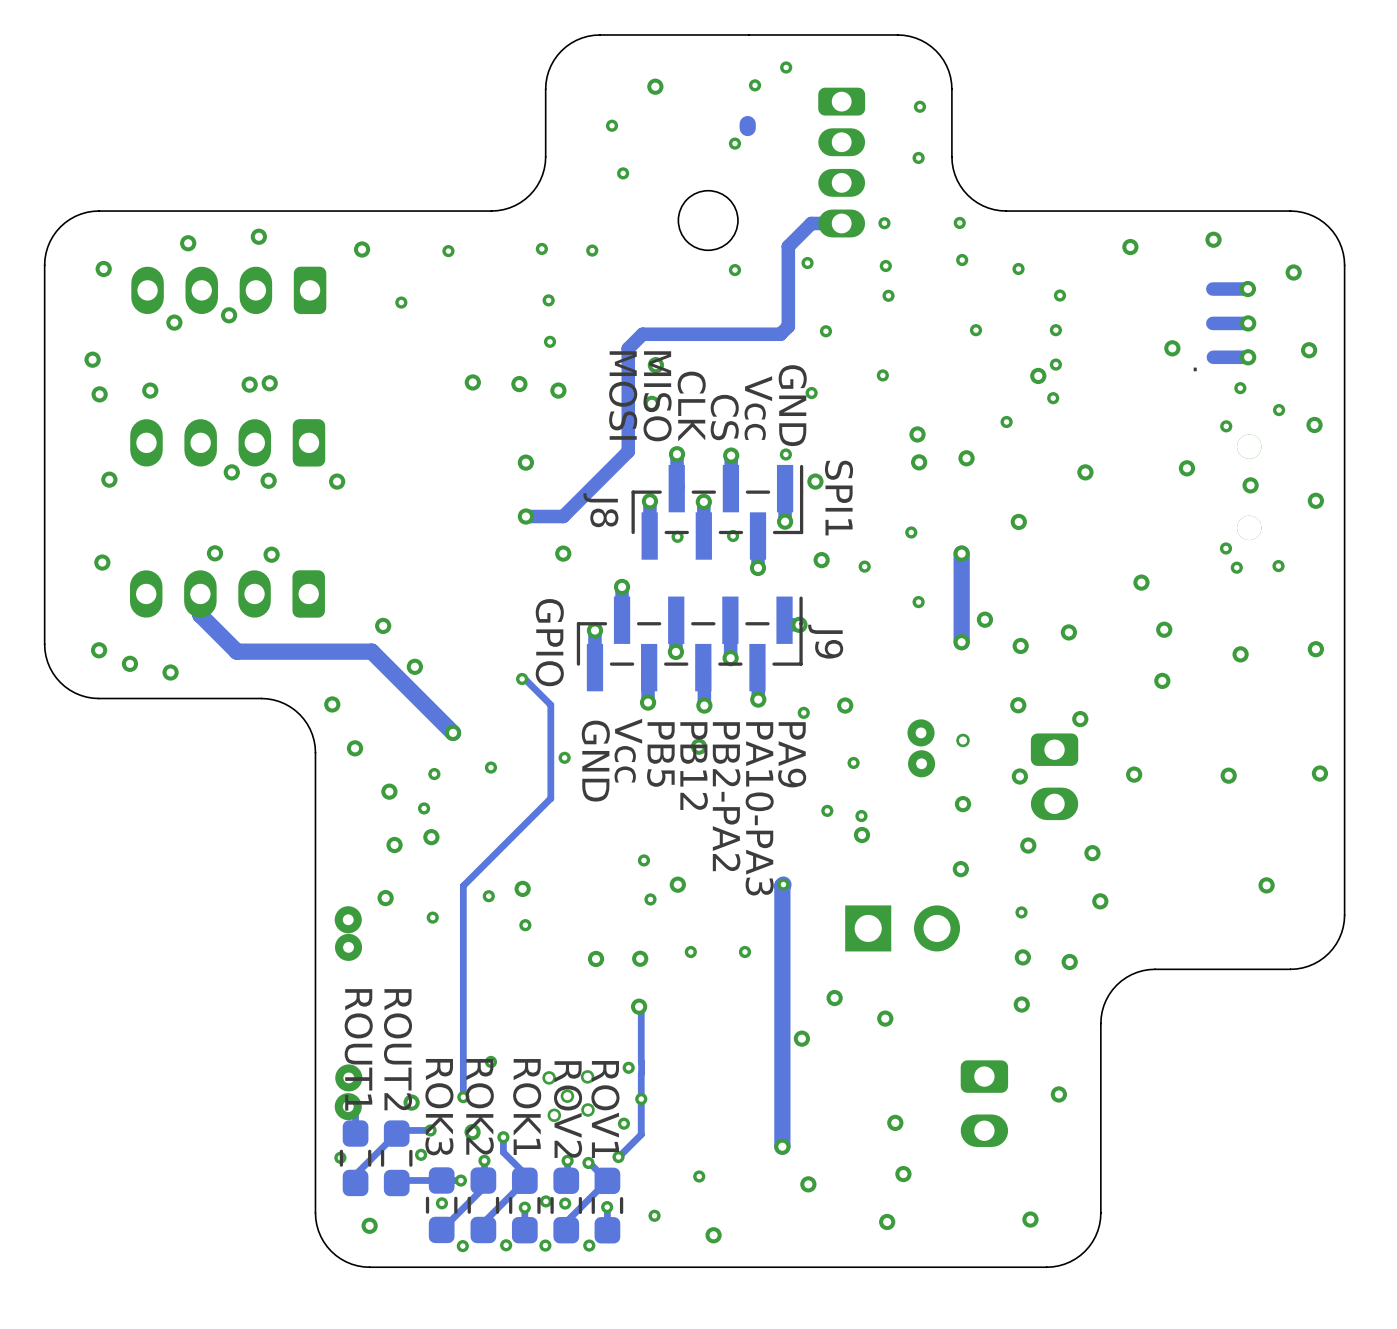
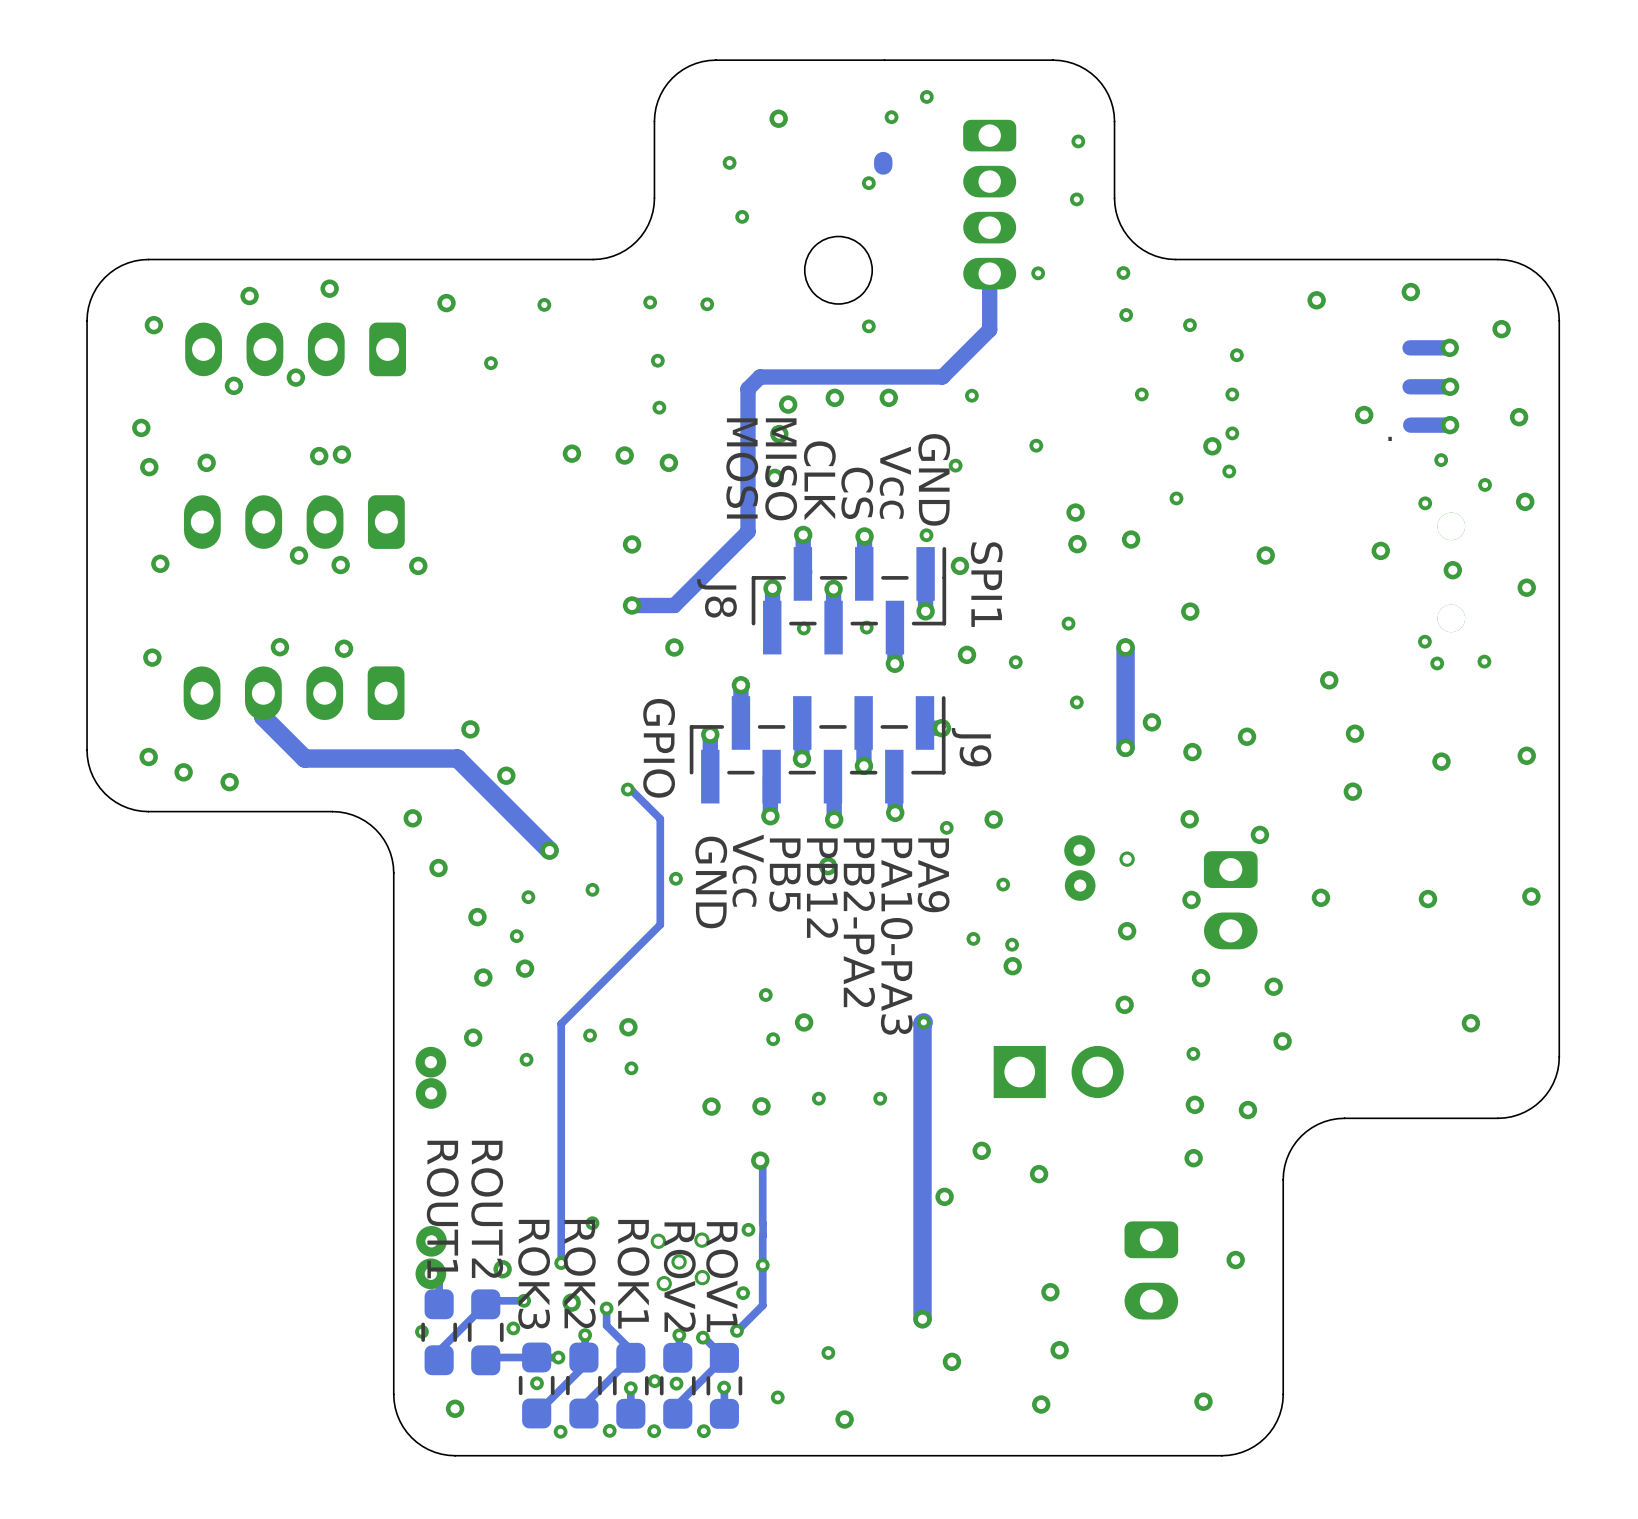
track: (841, 223) (811, 223) (788, 246) (788, 326) (780, 334) (642, 334) (628, 348) -> (989, 273) (989, 329) (942, 376) (759, 376) (748, 388) (748, 415)
via: (807, 263) -> none
via: (885, 266) -> none
via: (888, 295) -> none
via: none -> (834, 397)
via: none -> (888, 397)
via: none -> (788, 404)

